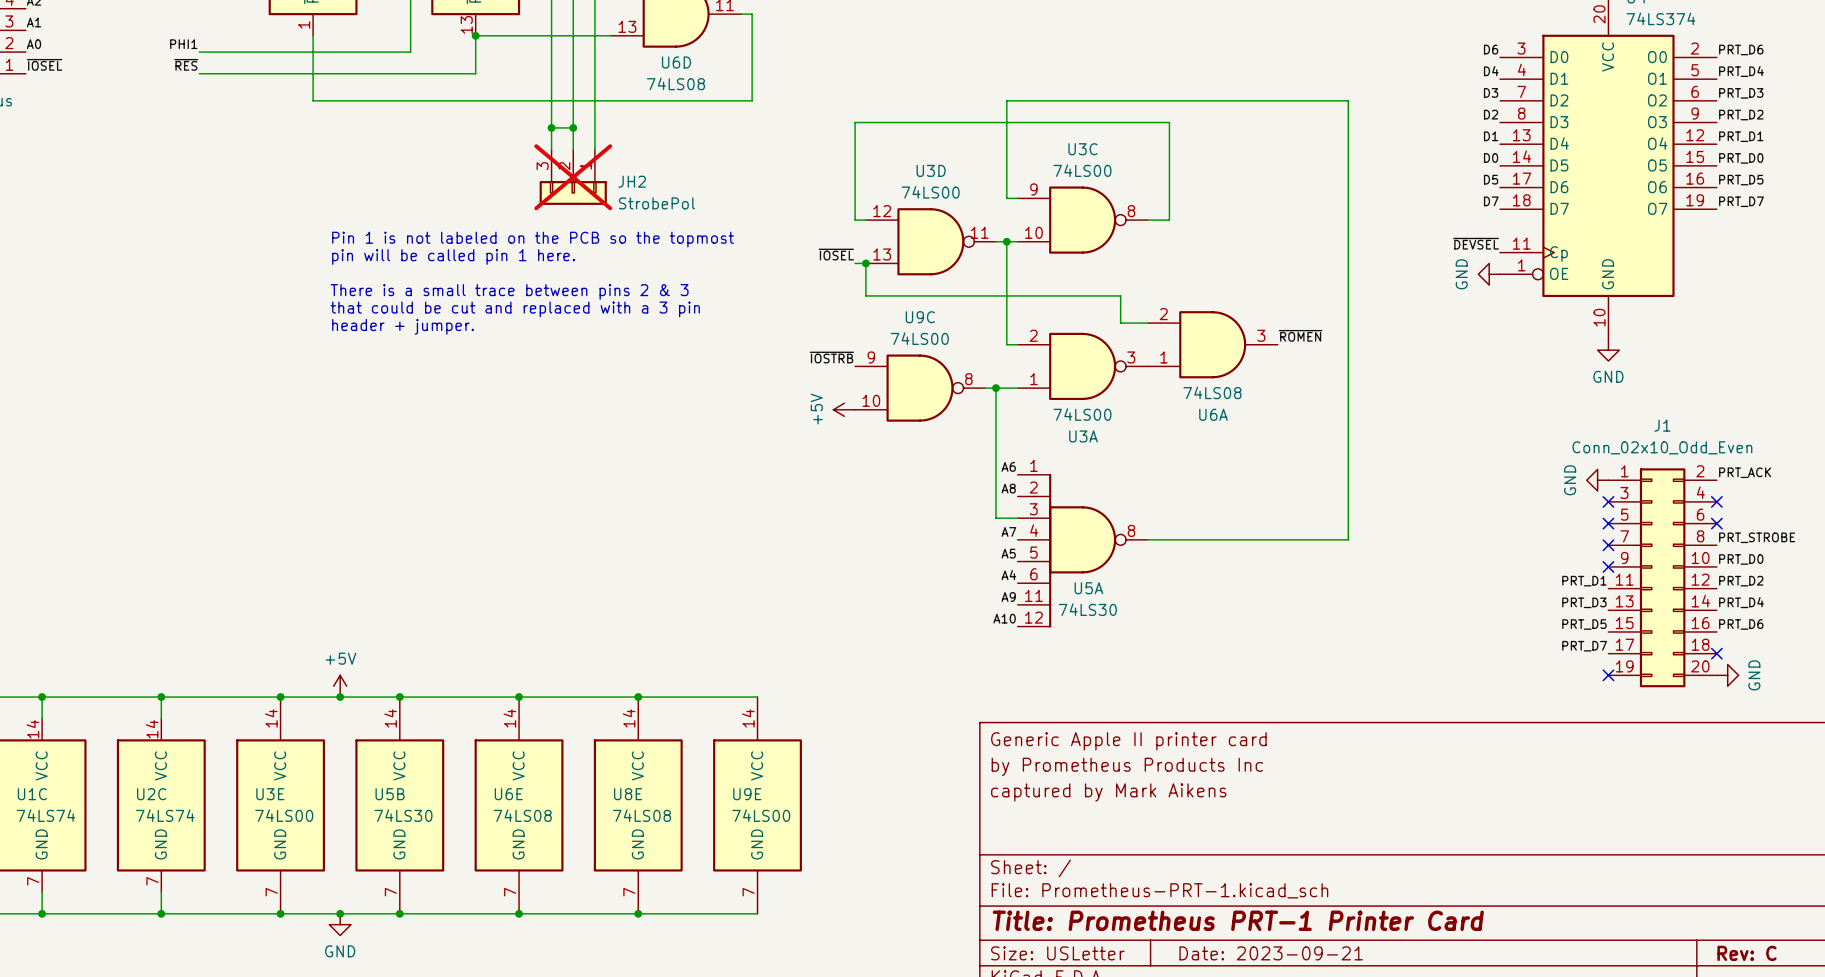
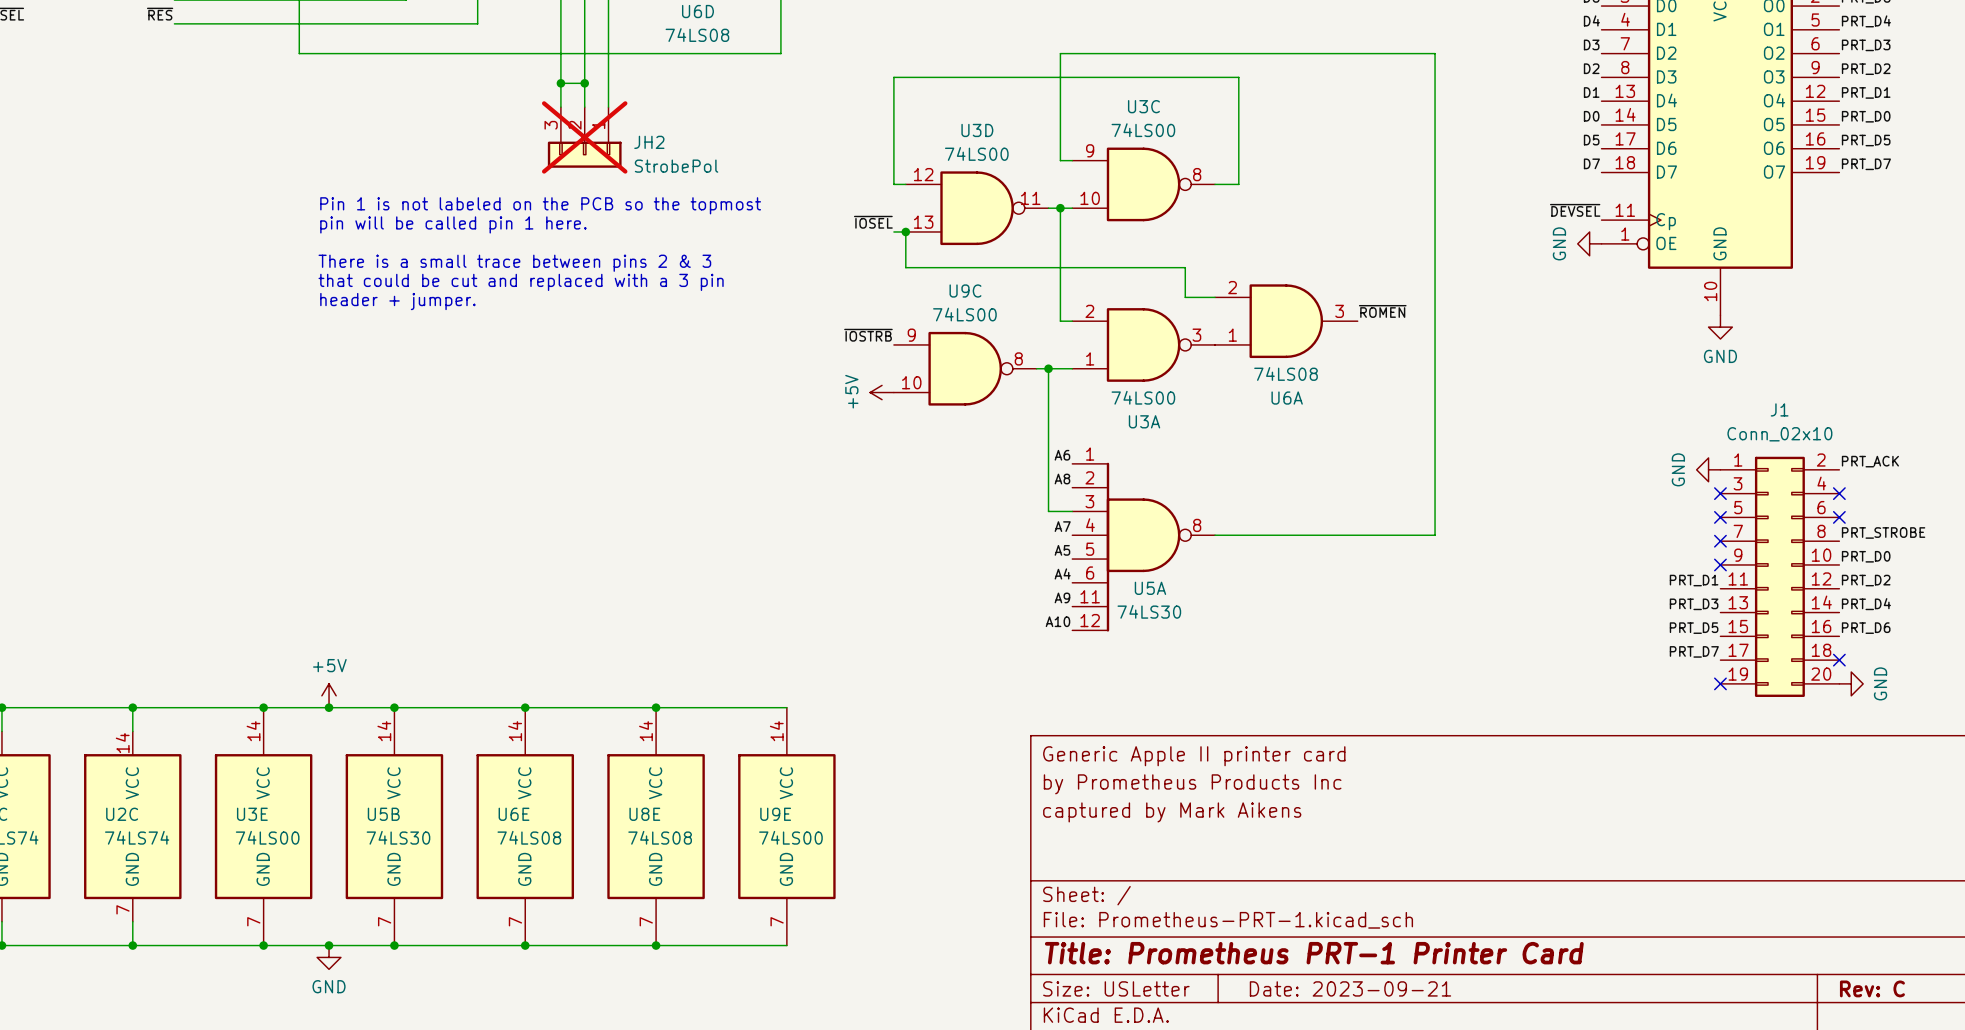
J1 value: Conn_02x10_Odd_Even (1662, 447) -> Conn_02x10 (1779, 434)

